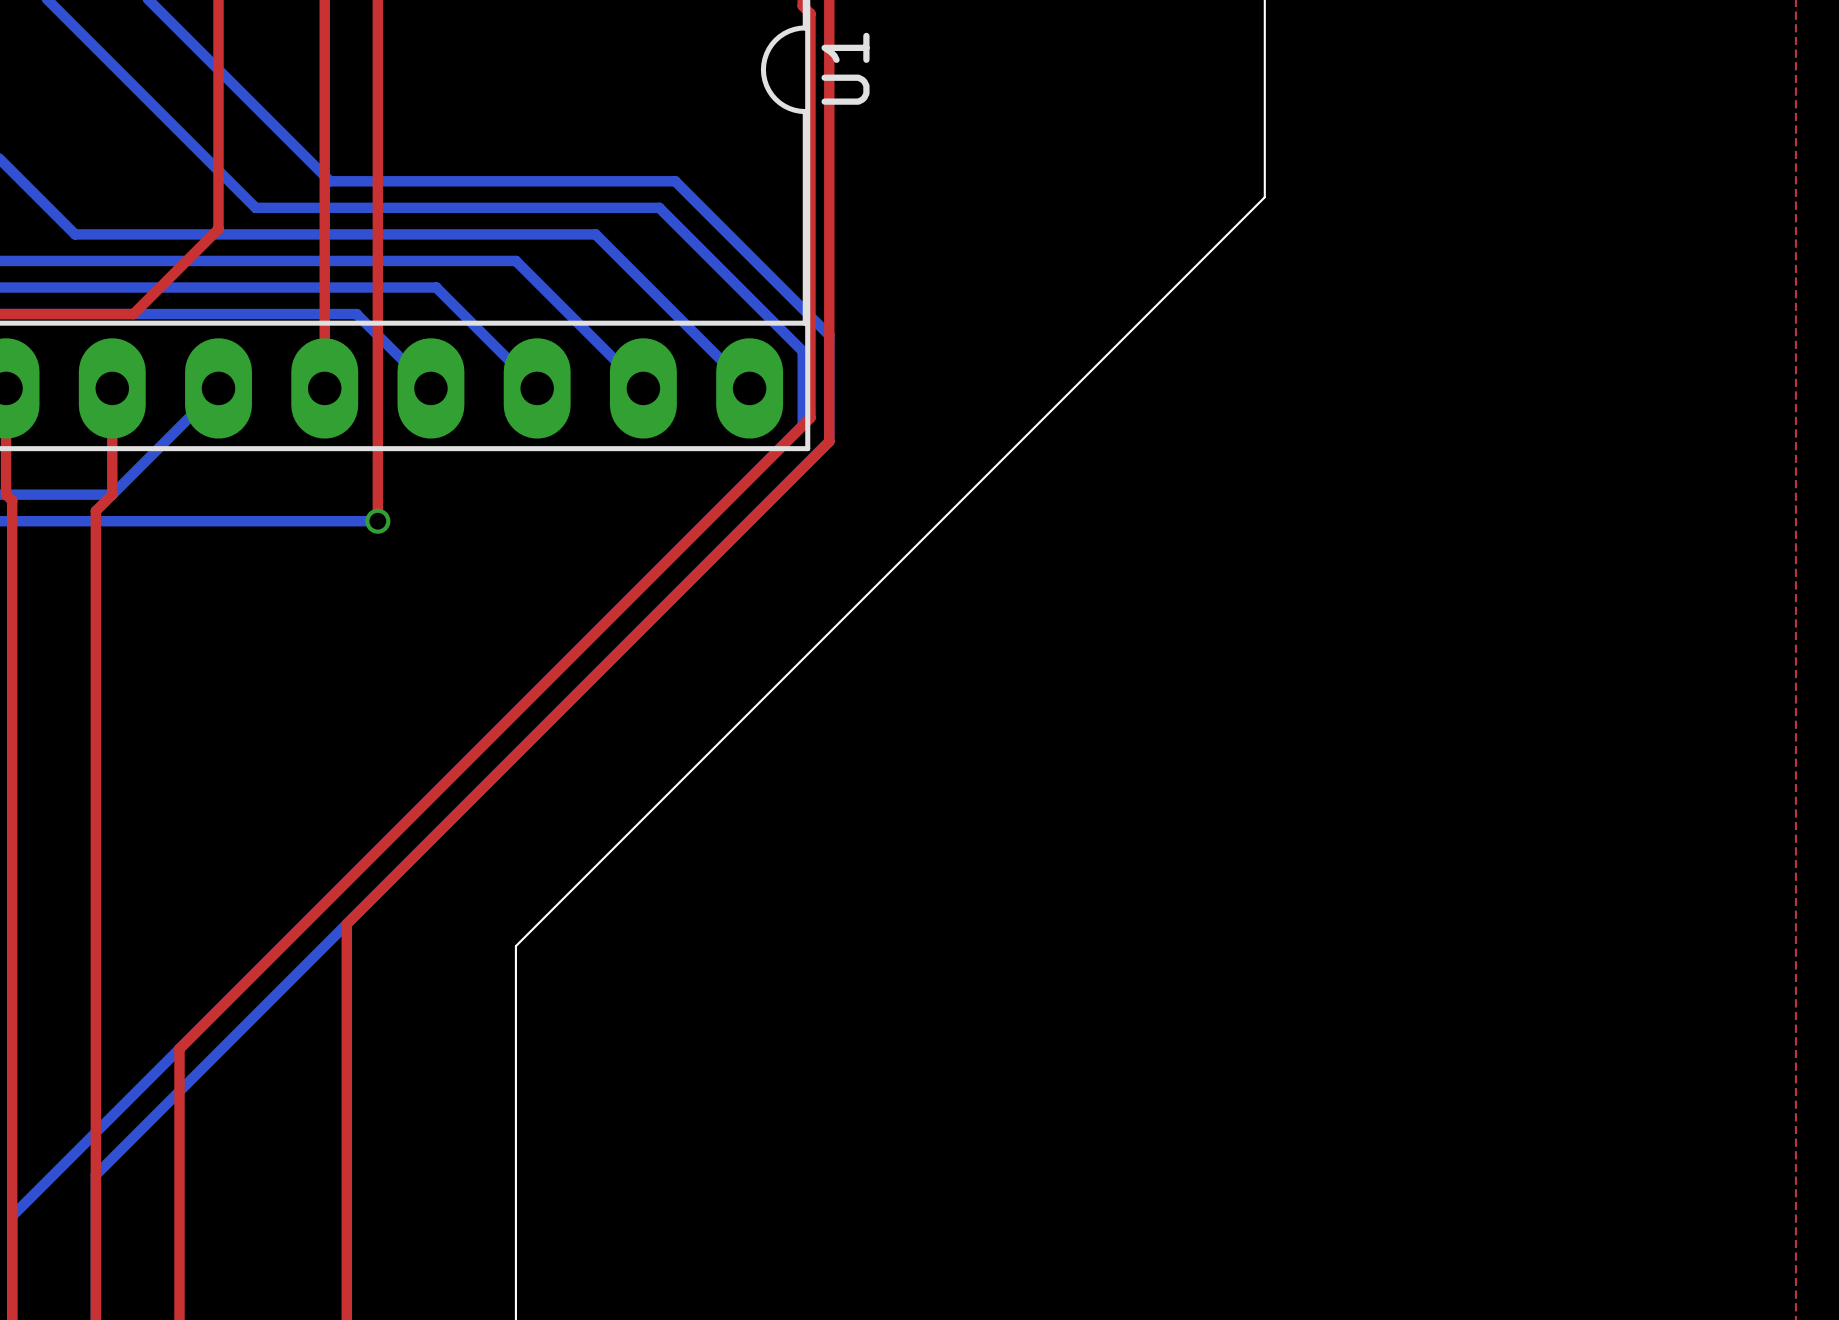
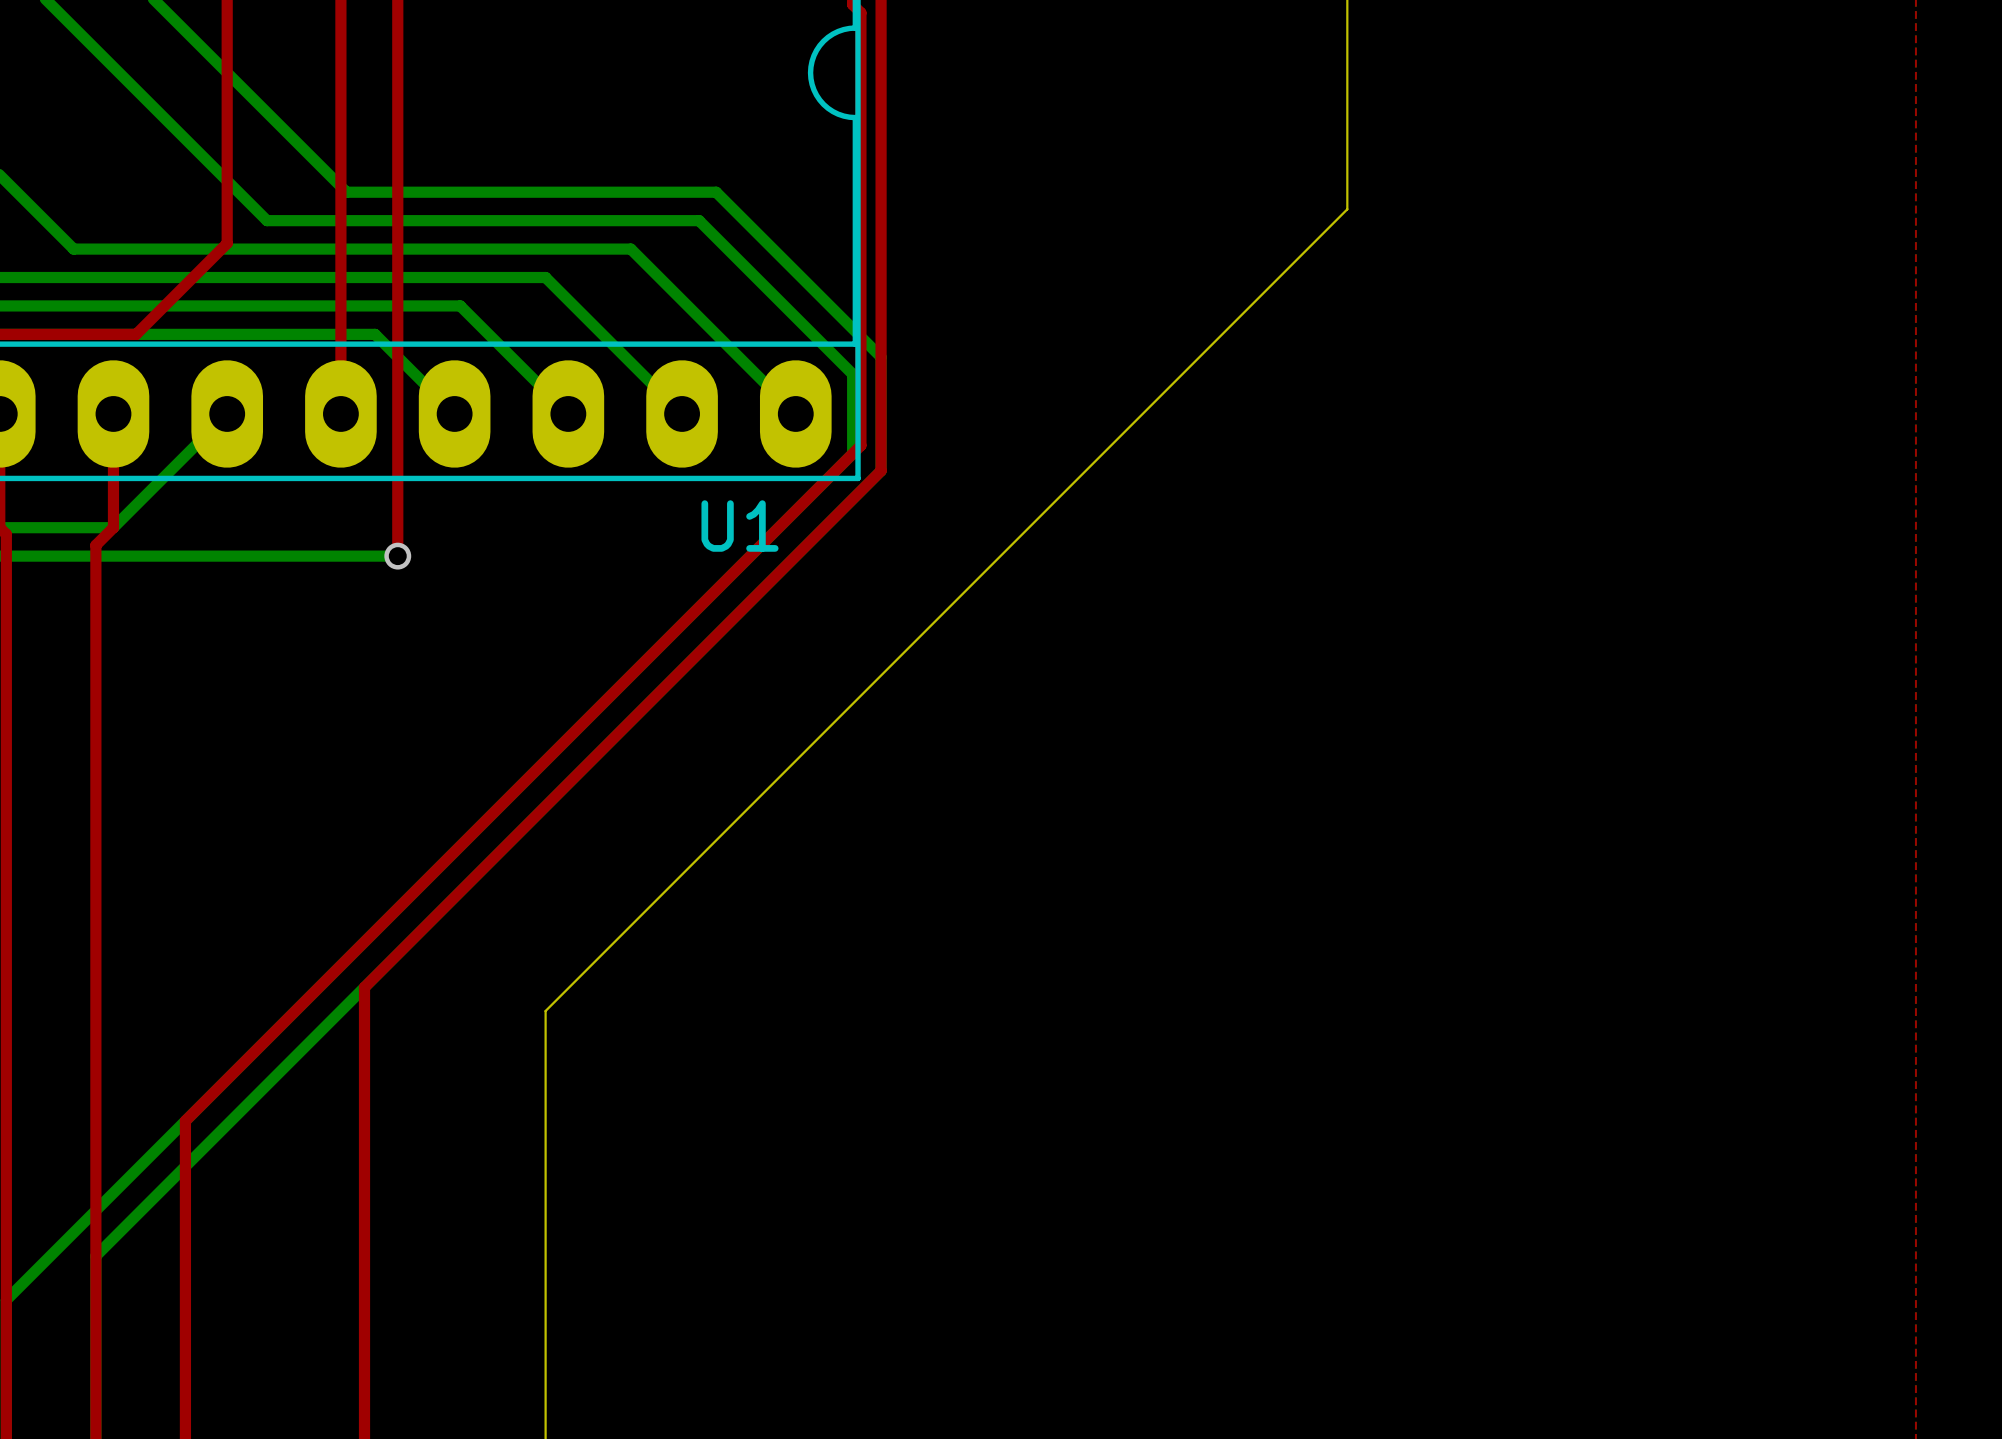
U1 name rotation: 0° (845, 68) -> 90° clockwise (739, 526)
U1 name position: U1 (845, 68) -> U1 (739, 526)

